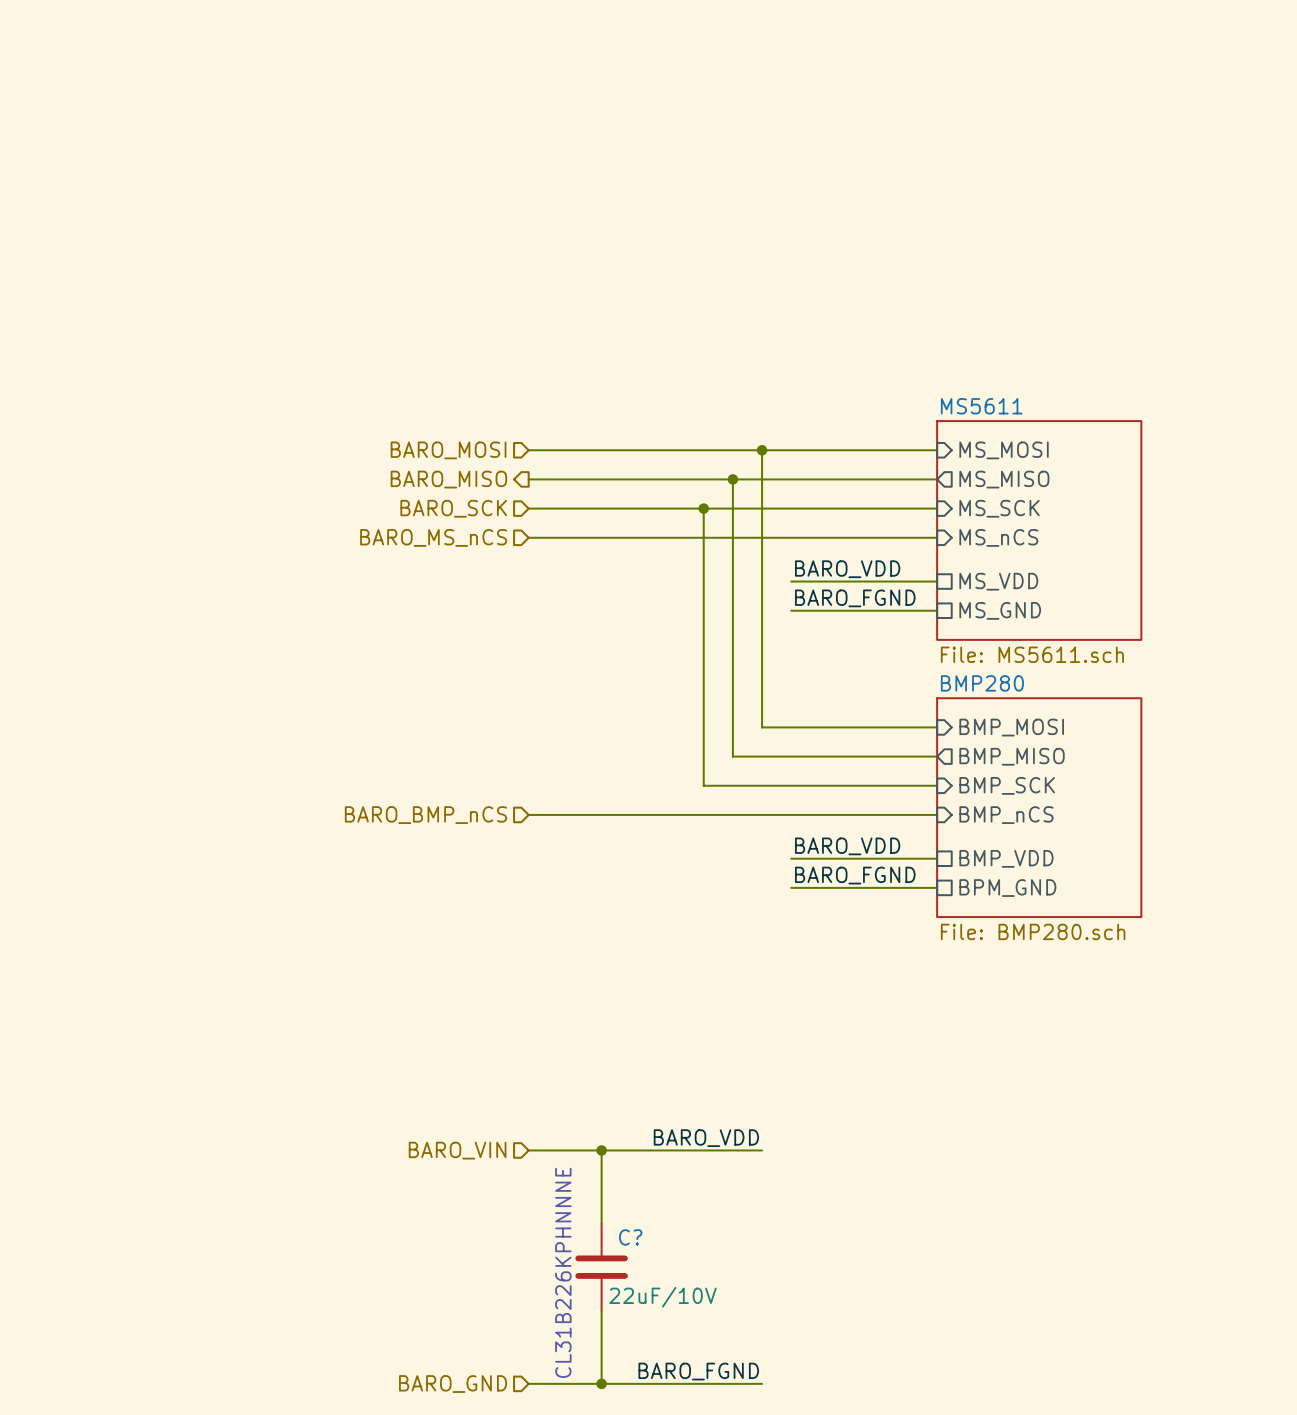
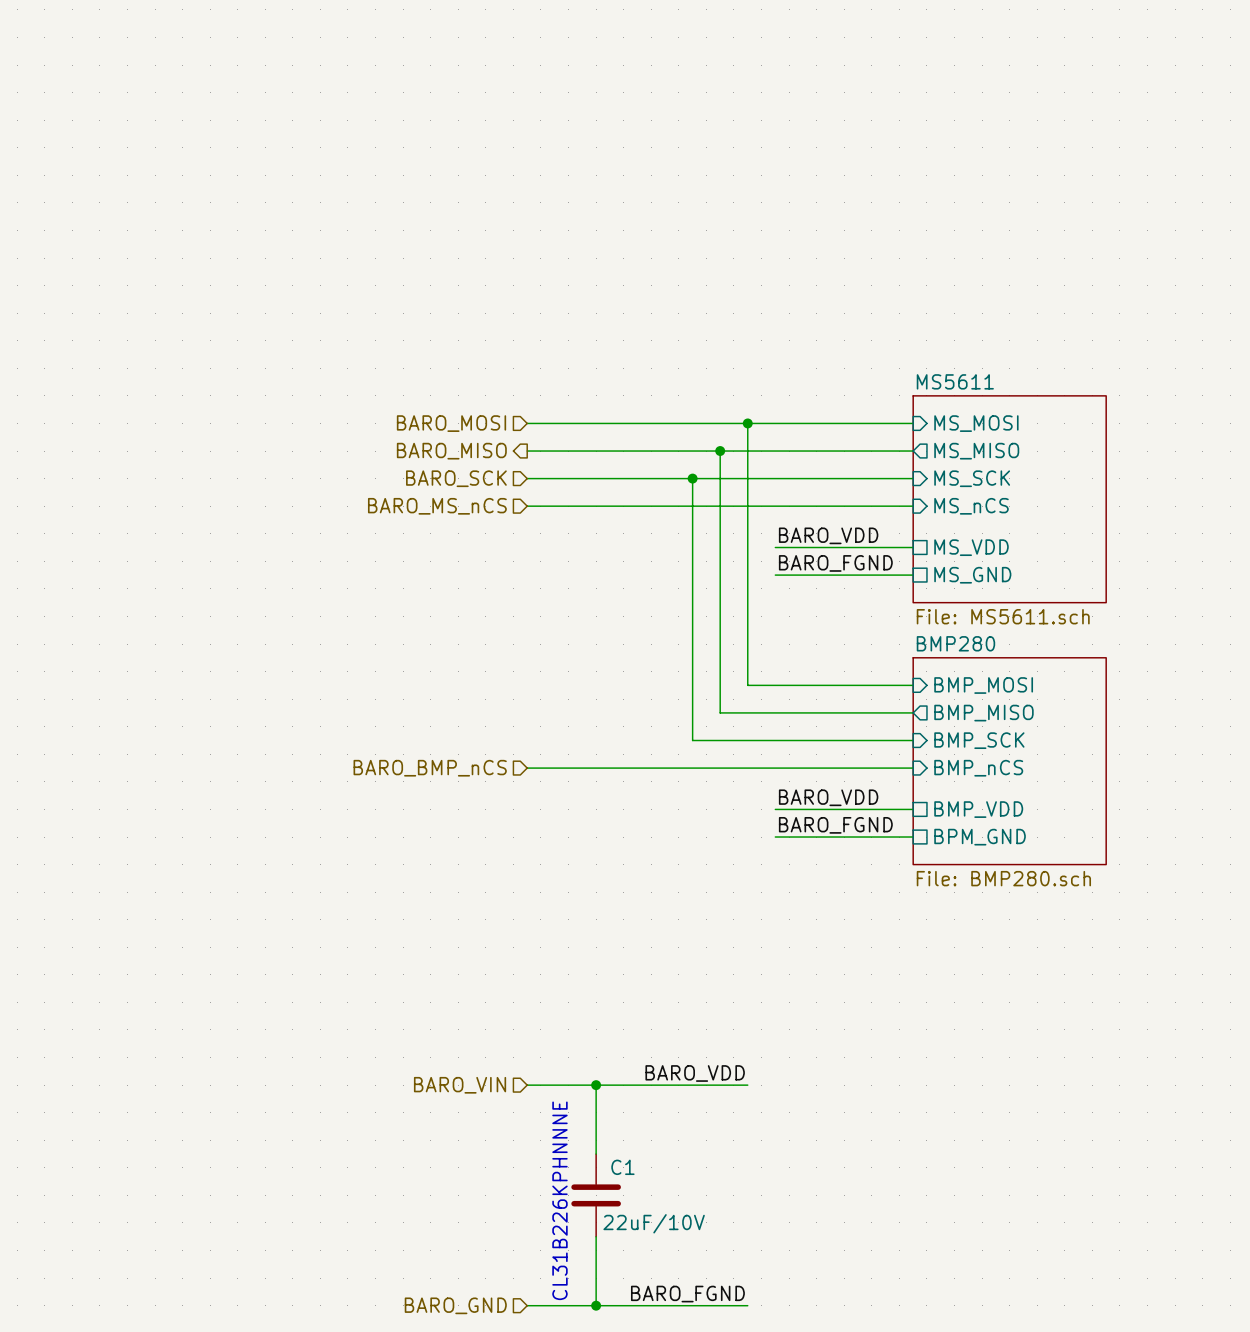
C? name: C? (630, 1237) -> C1 (622, 1167)

